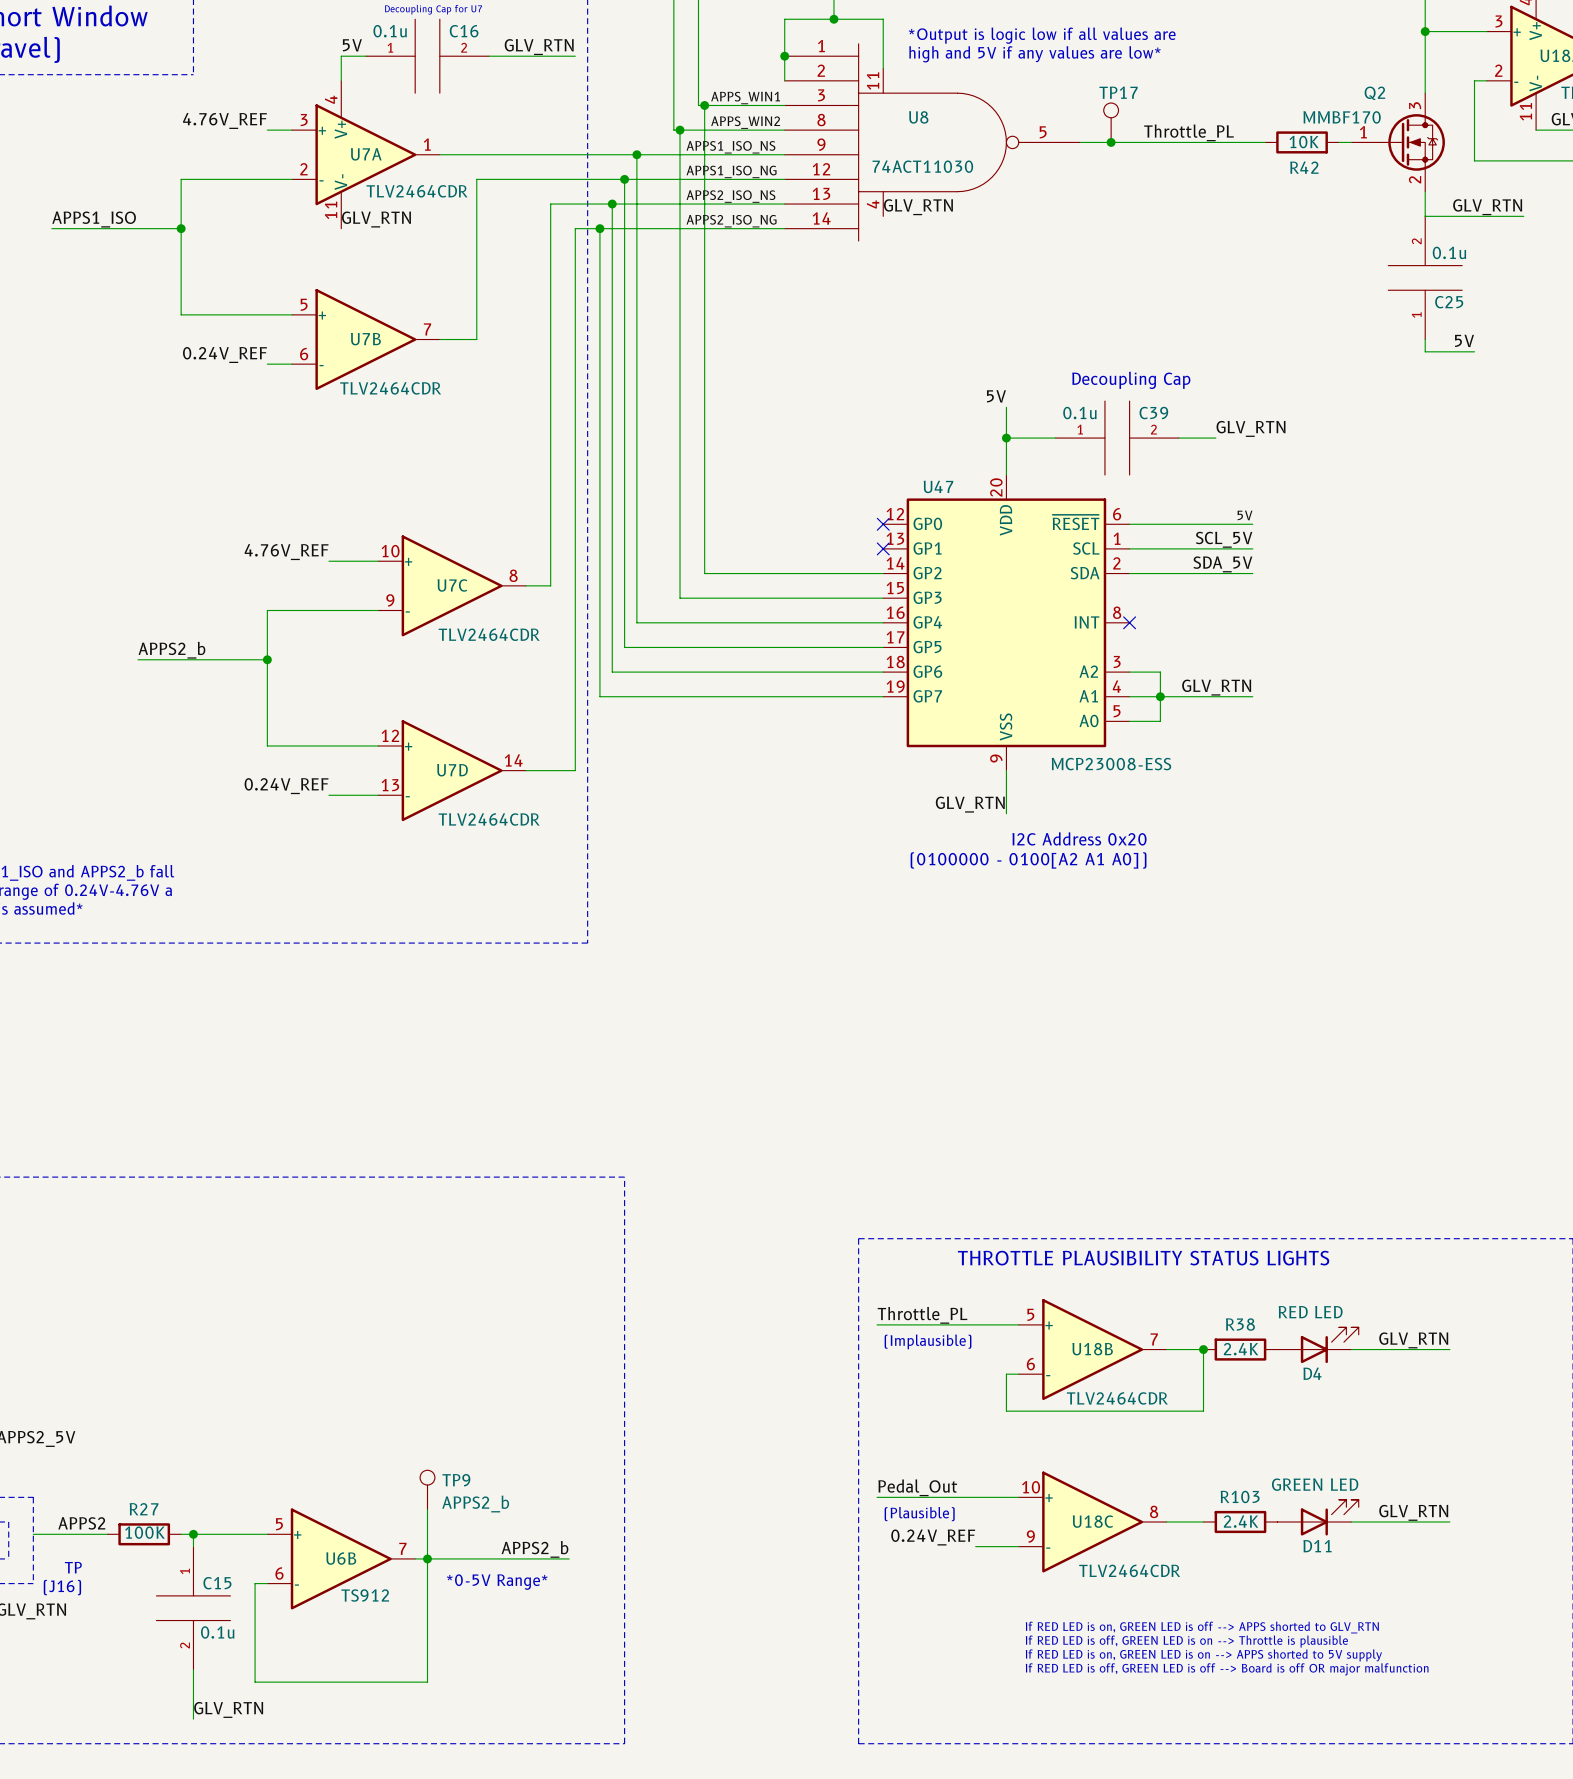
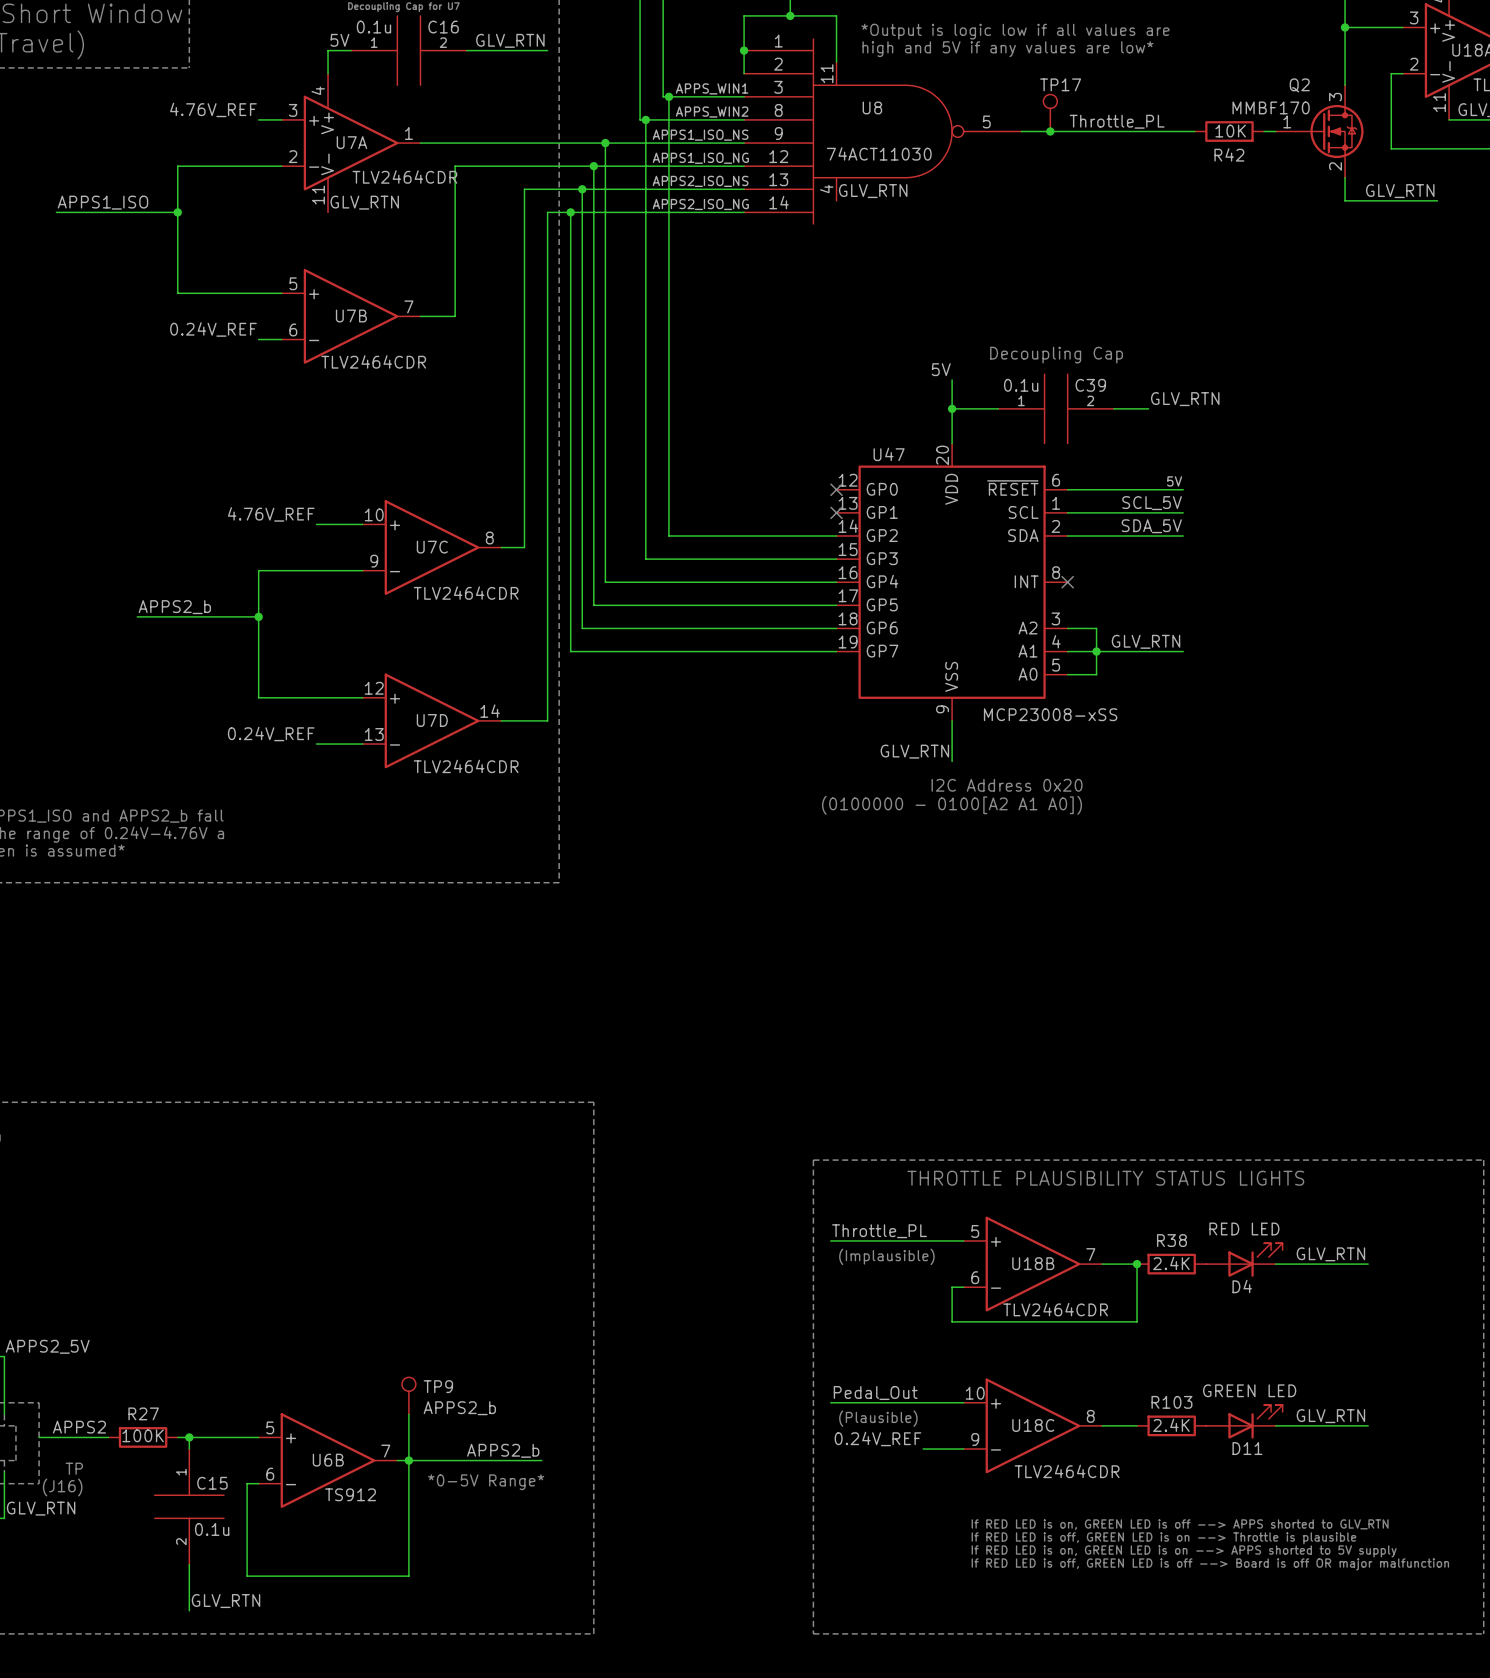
C25: 0.1u (1425, 277) -> none
wire: (1425, 339) (1425, 351) (1474, 351) -> none
label: 5V (1464, 340) -> none
U47 value: MCP23008-ESS (1111, 764) -> MCP23008-xSS (1050, 714)

